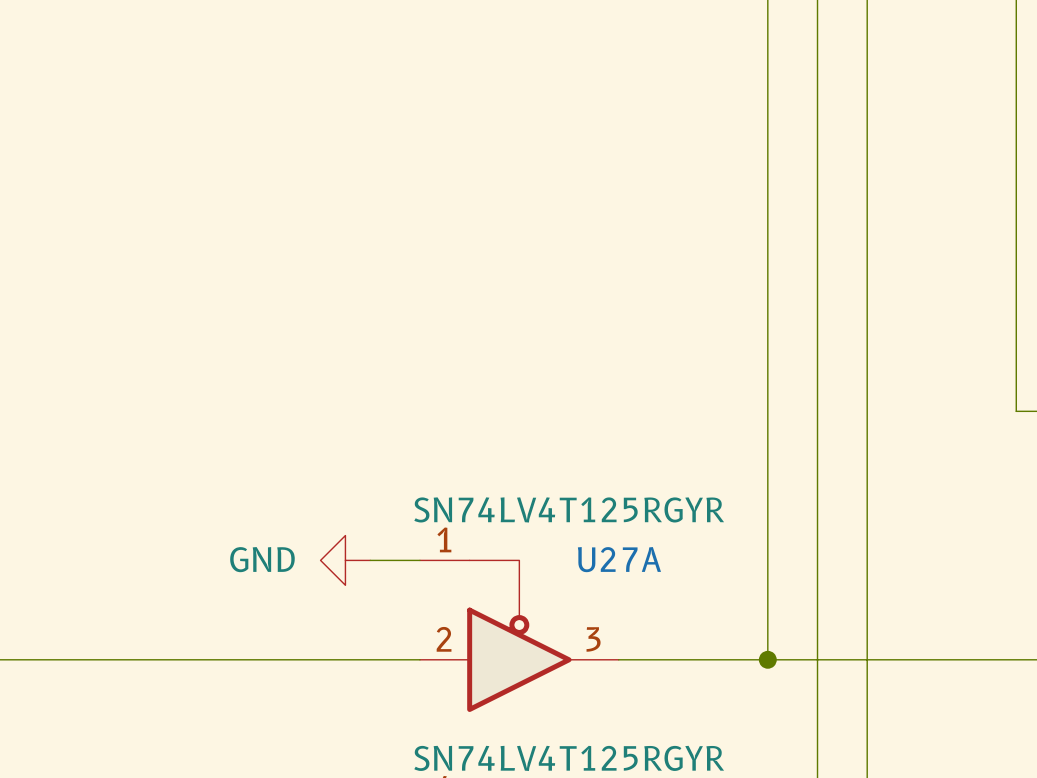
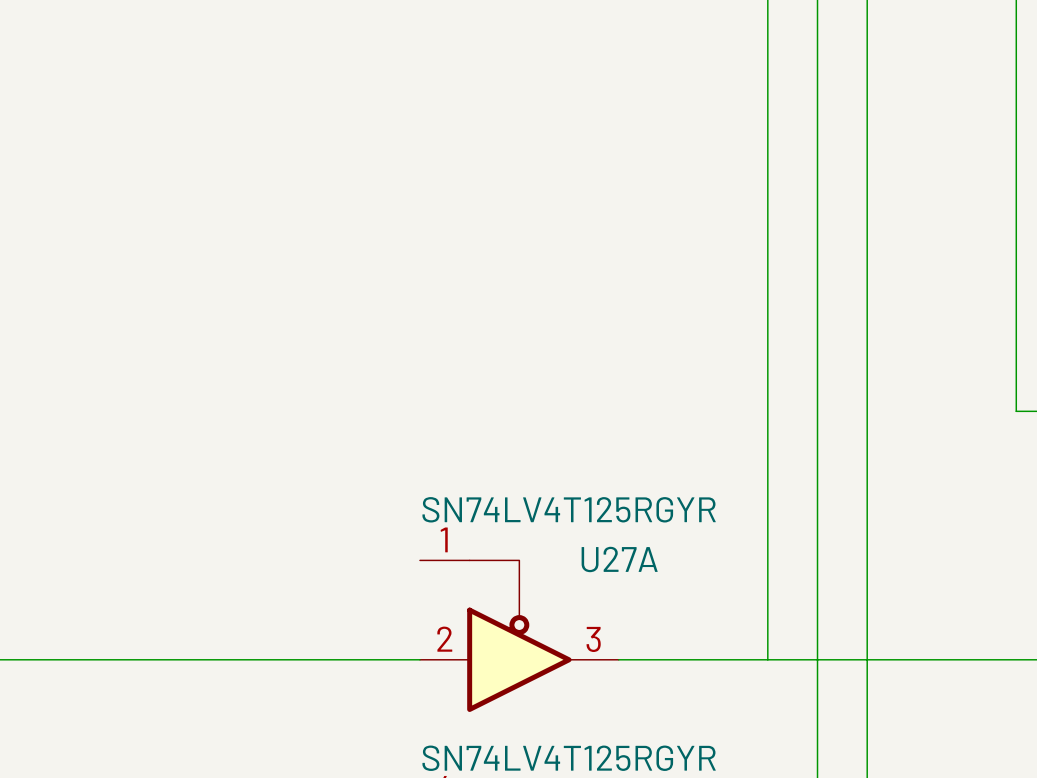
power symbol: GND (345, 560) -> none
wire: (370, 560) (419, 560) -> none
junction: (767, 659) -> none

